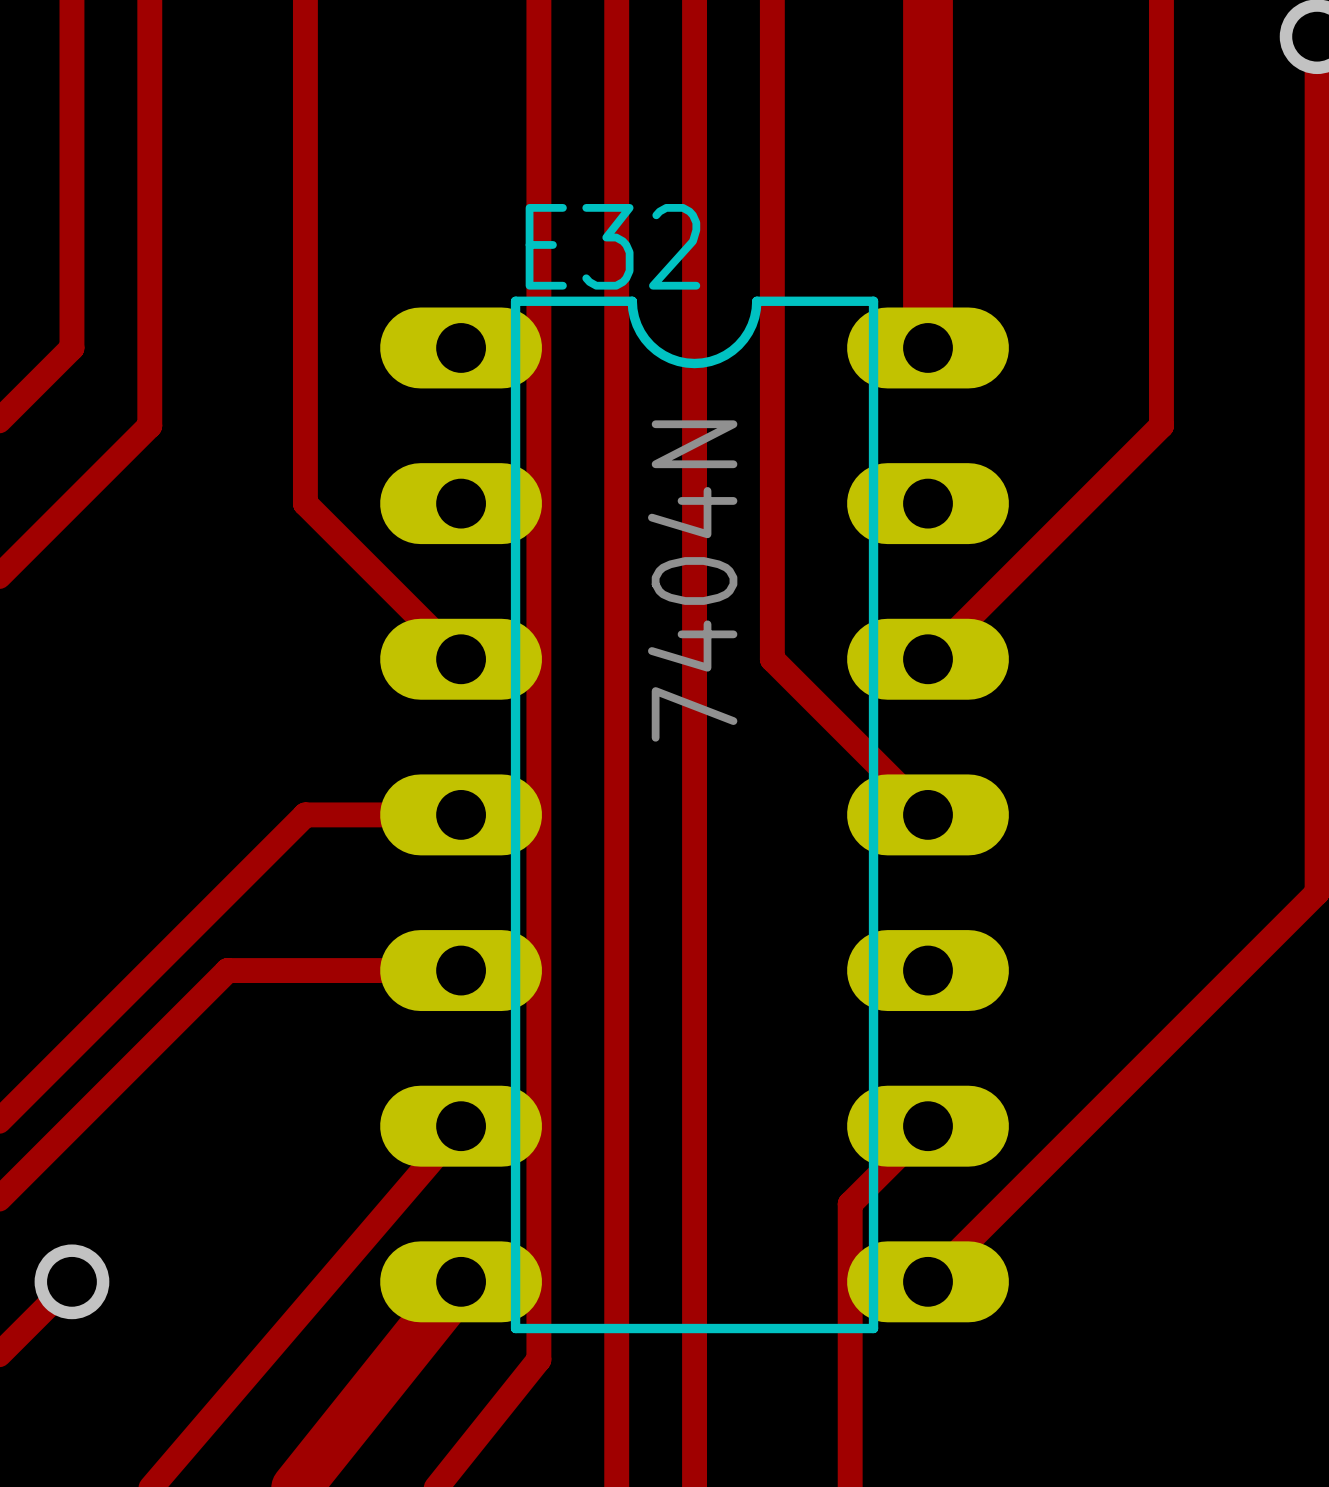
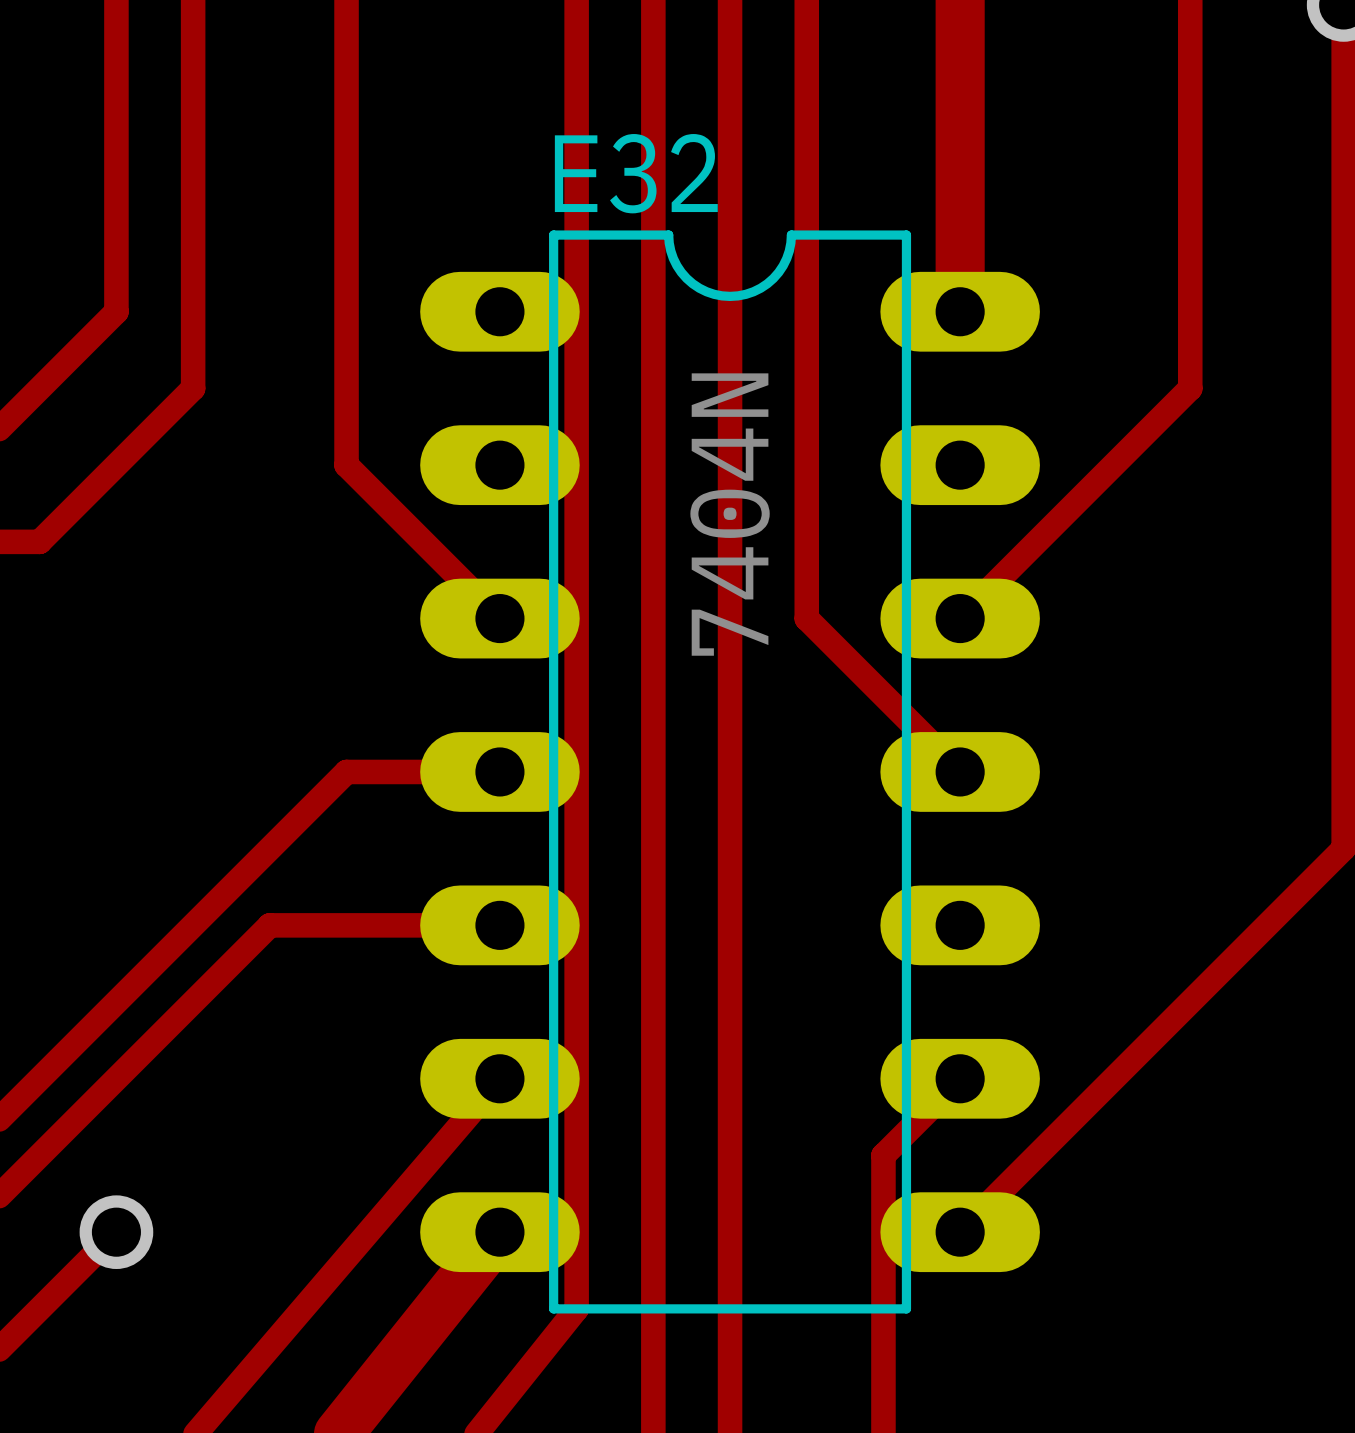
E32 name position: E32 (612, 246) -> E32 (636, 173)
E32 footprint: [380, 296, 1009, 1334] -> [420, 230, 1040, 1314]

